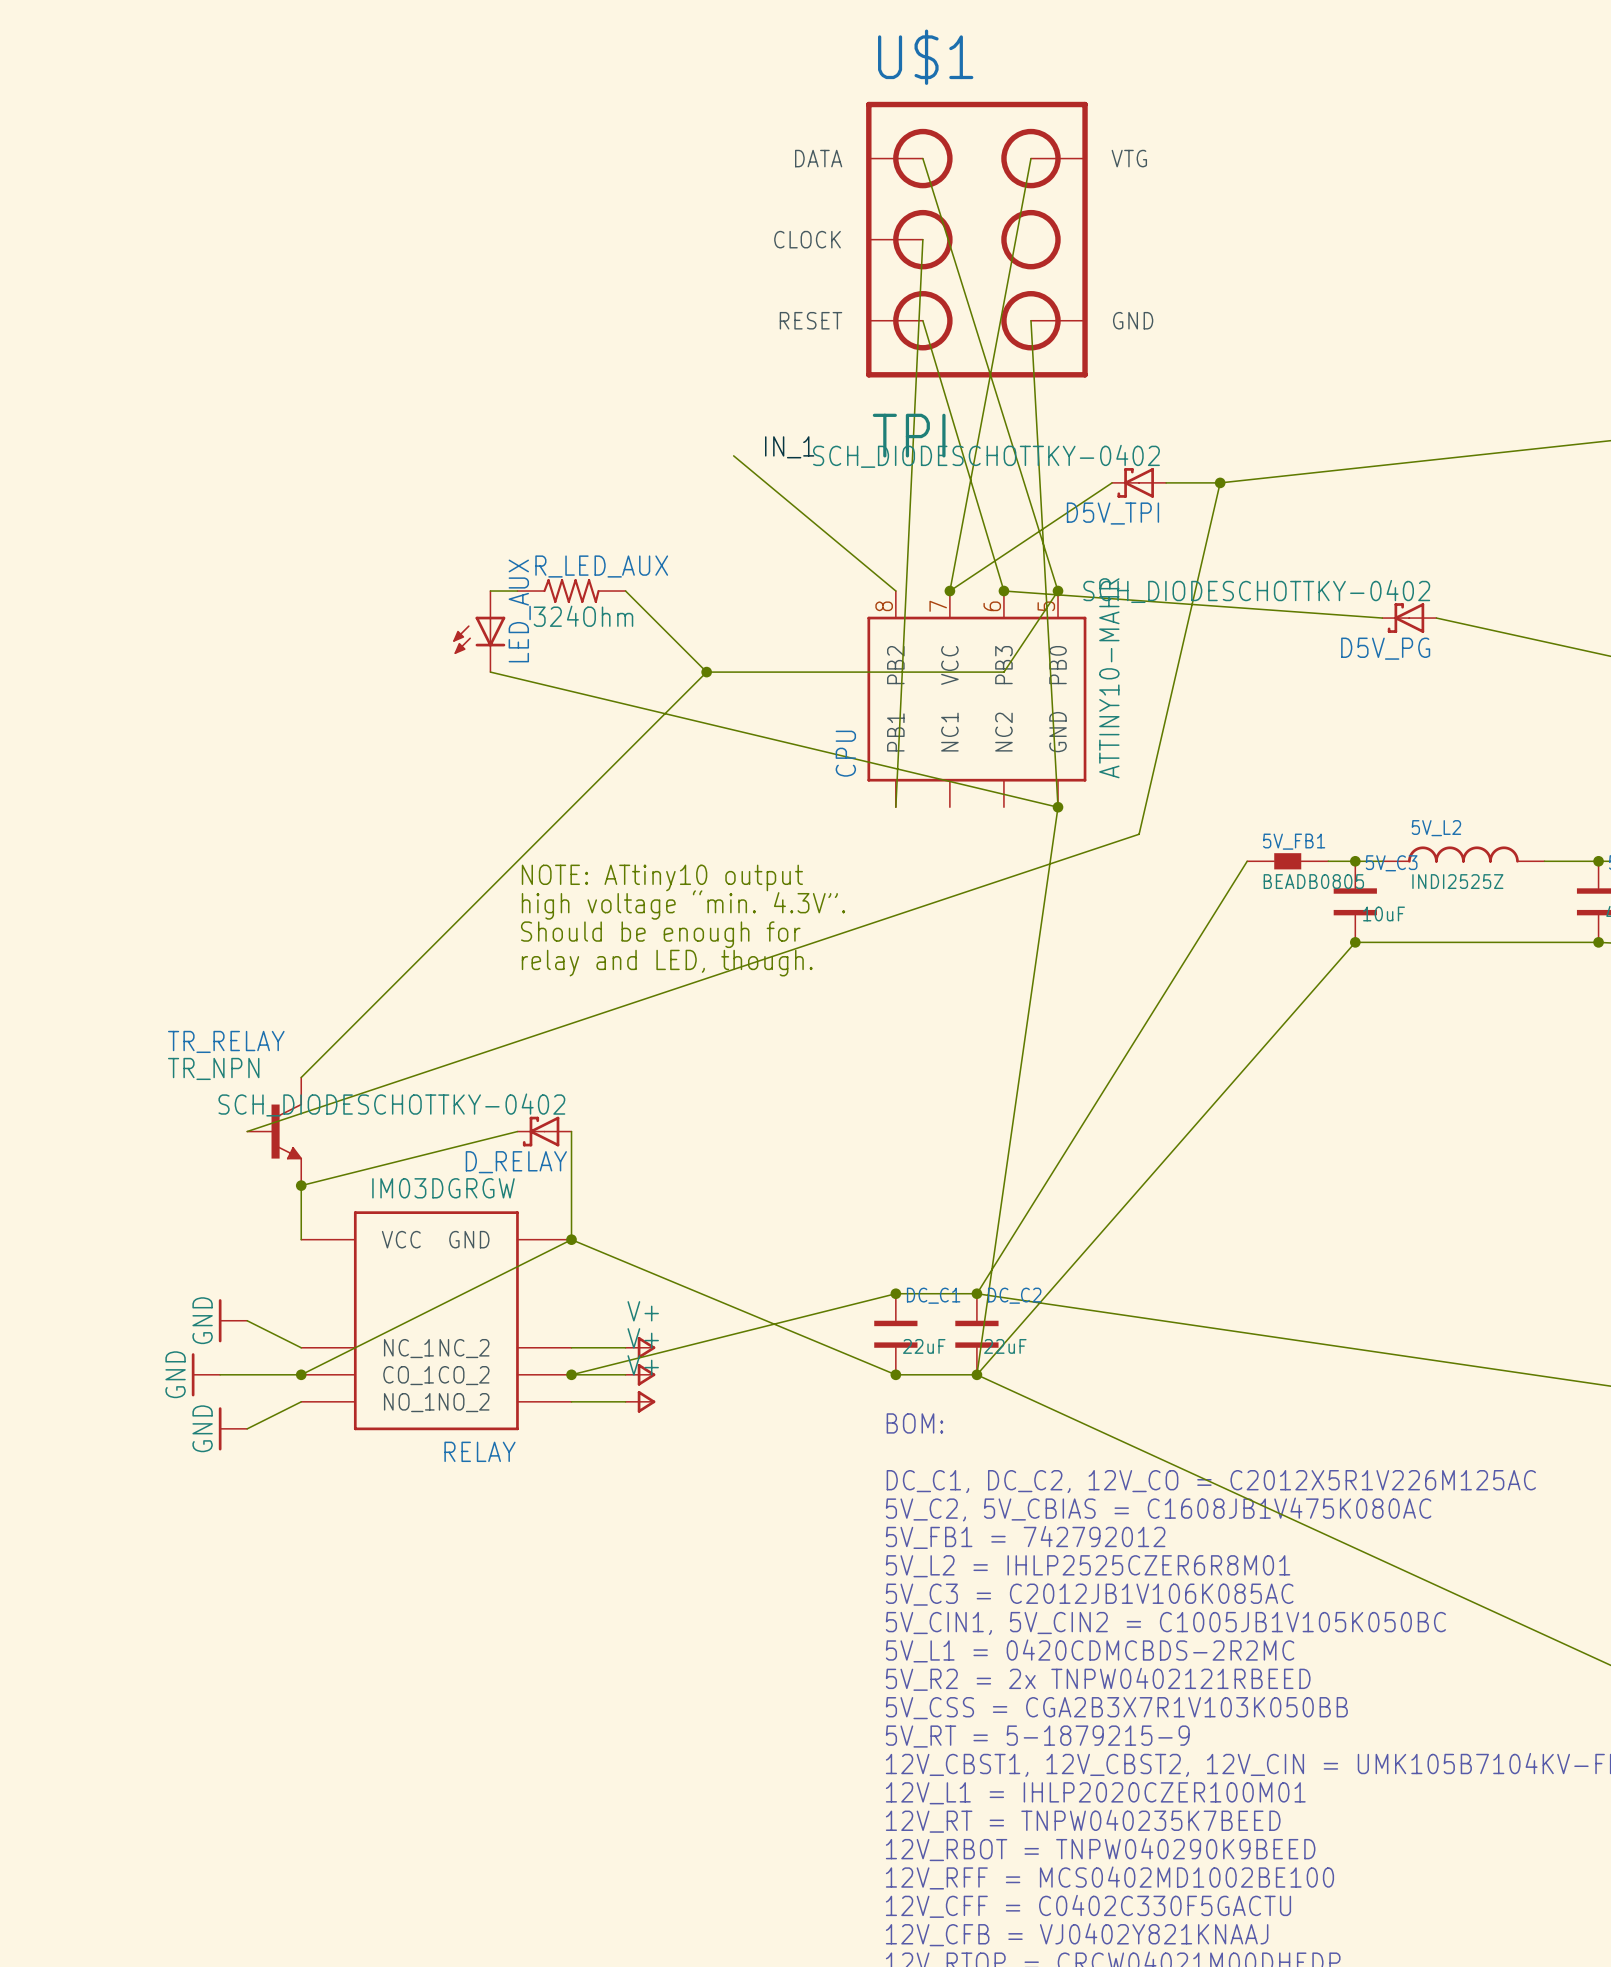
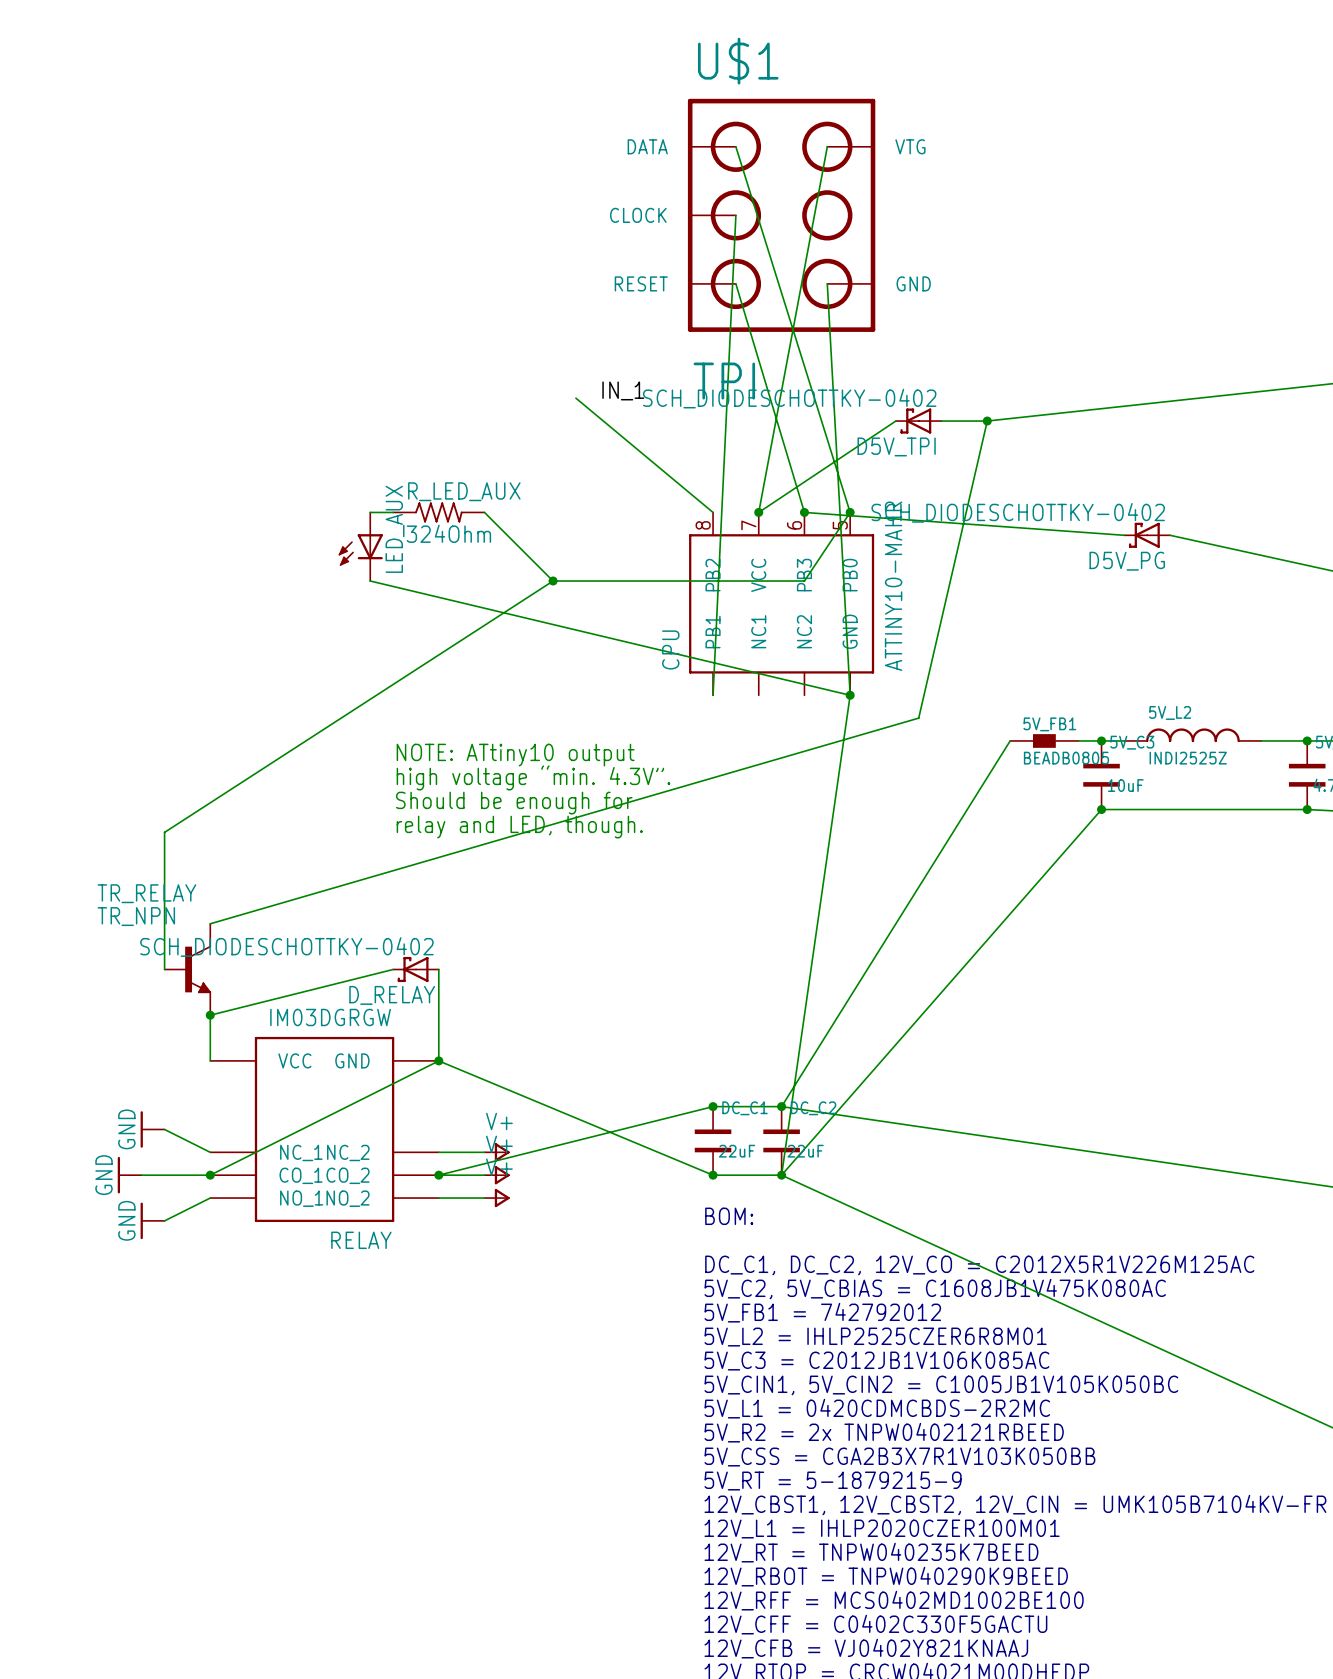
wire: (706, 672) (301, 1077) -> (553, 581) (164, 832) (164, 969)
wire: (1139, 834) (247, 1131) -> (918, 718) (210, 923)

